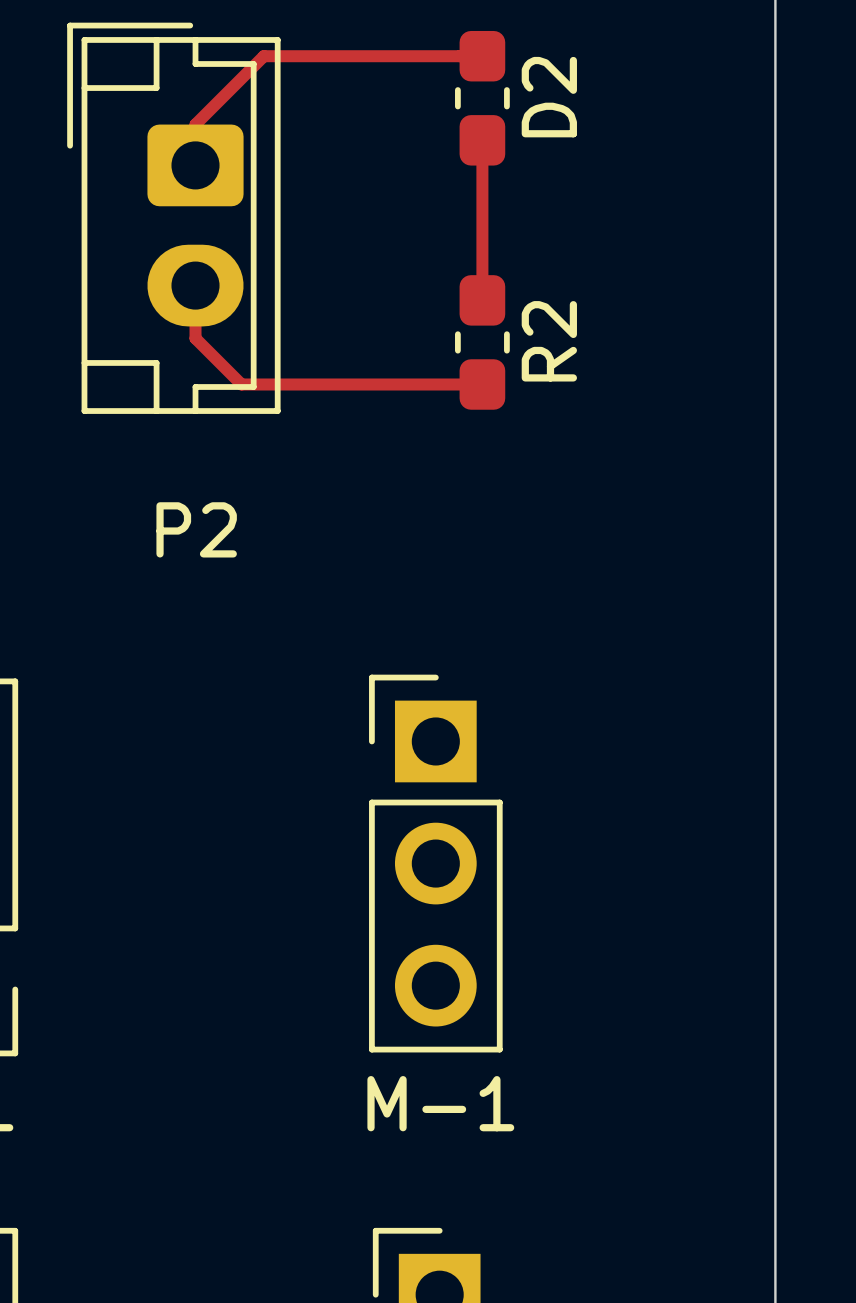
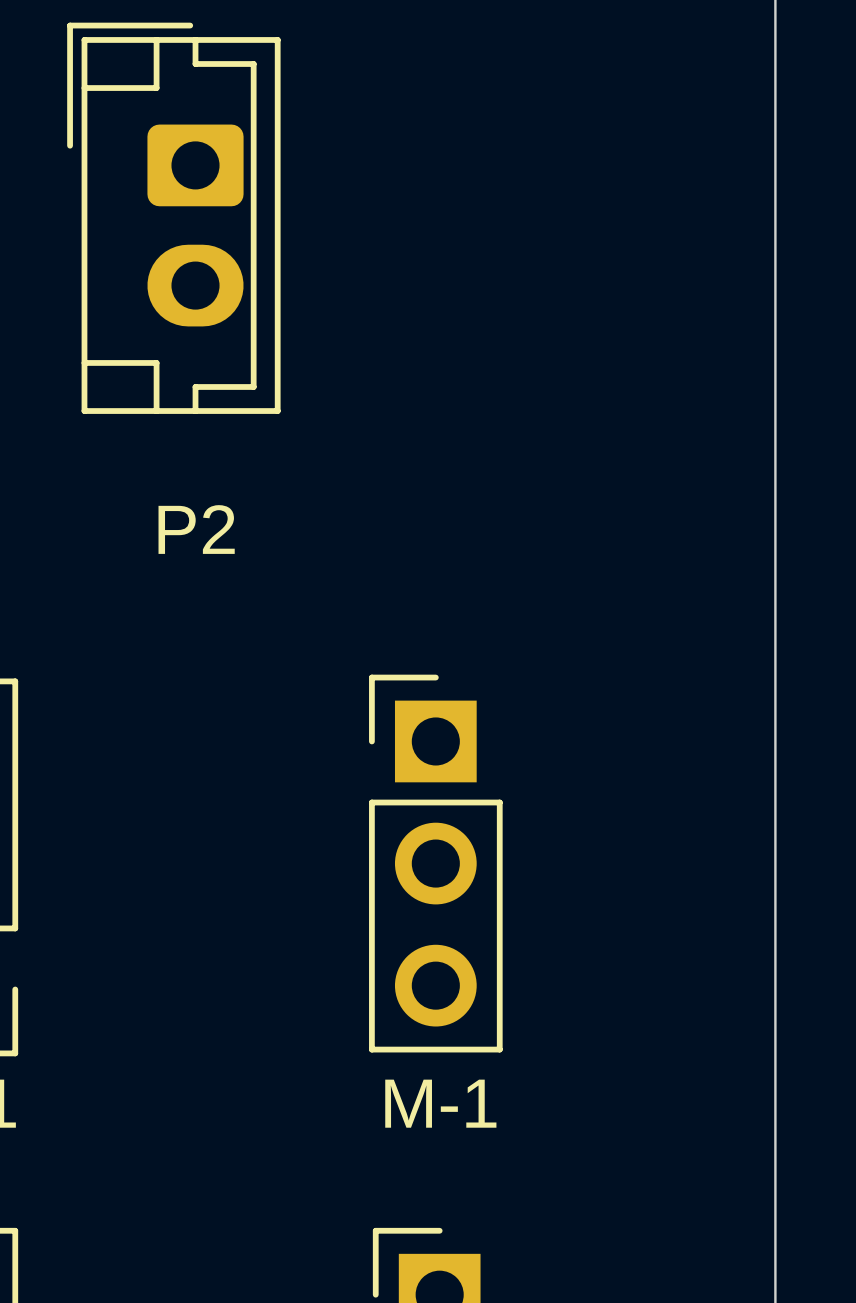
track: (482, 56) (263, 56) (195, 124) (195, 165) -> none
D2: (482, 98) -> none
track: (482, 140) (482, 300) -> none
track: (195, 285) (195, 338) (241, 384) (482, 384) -> none
R2: (482, 342) -> none

